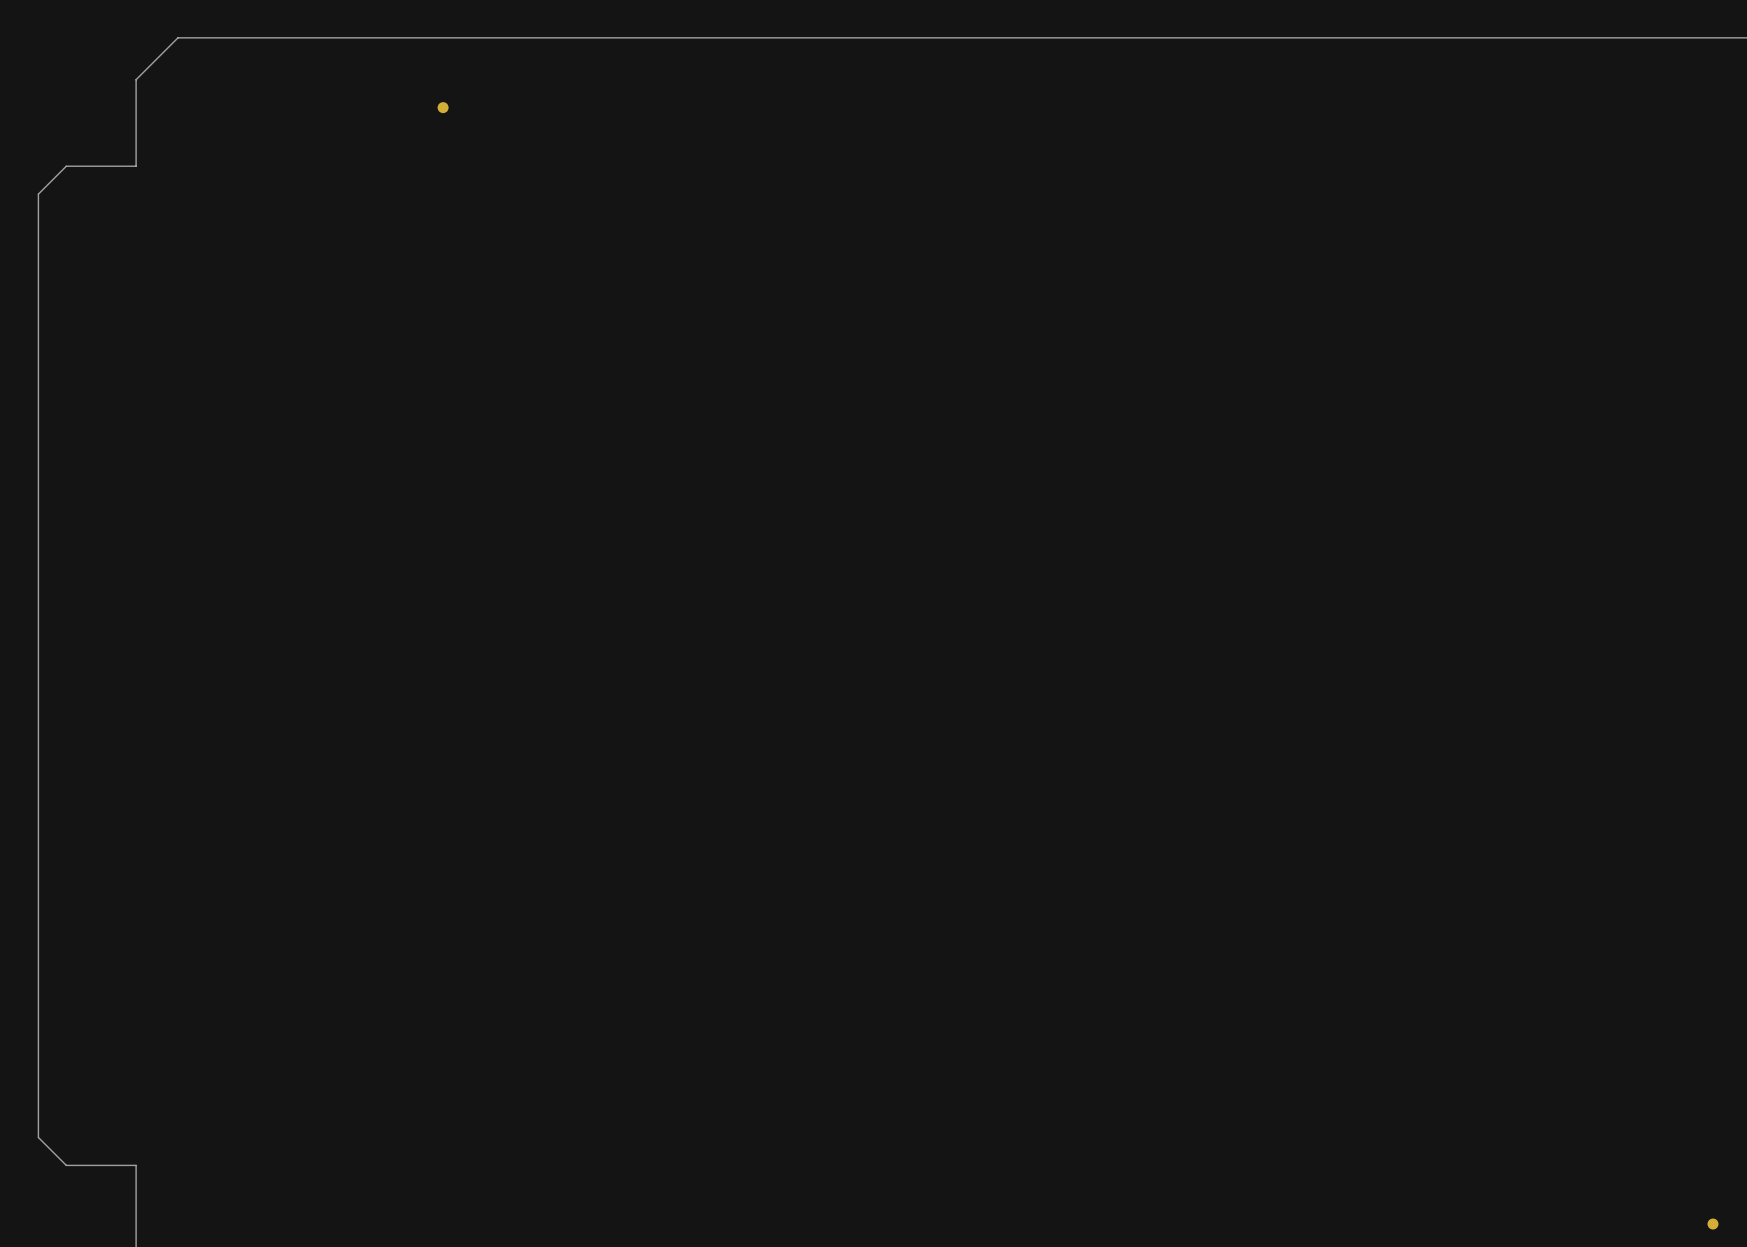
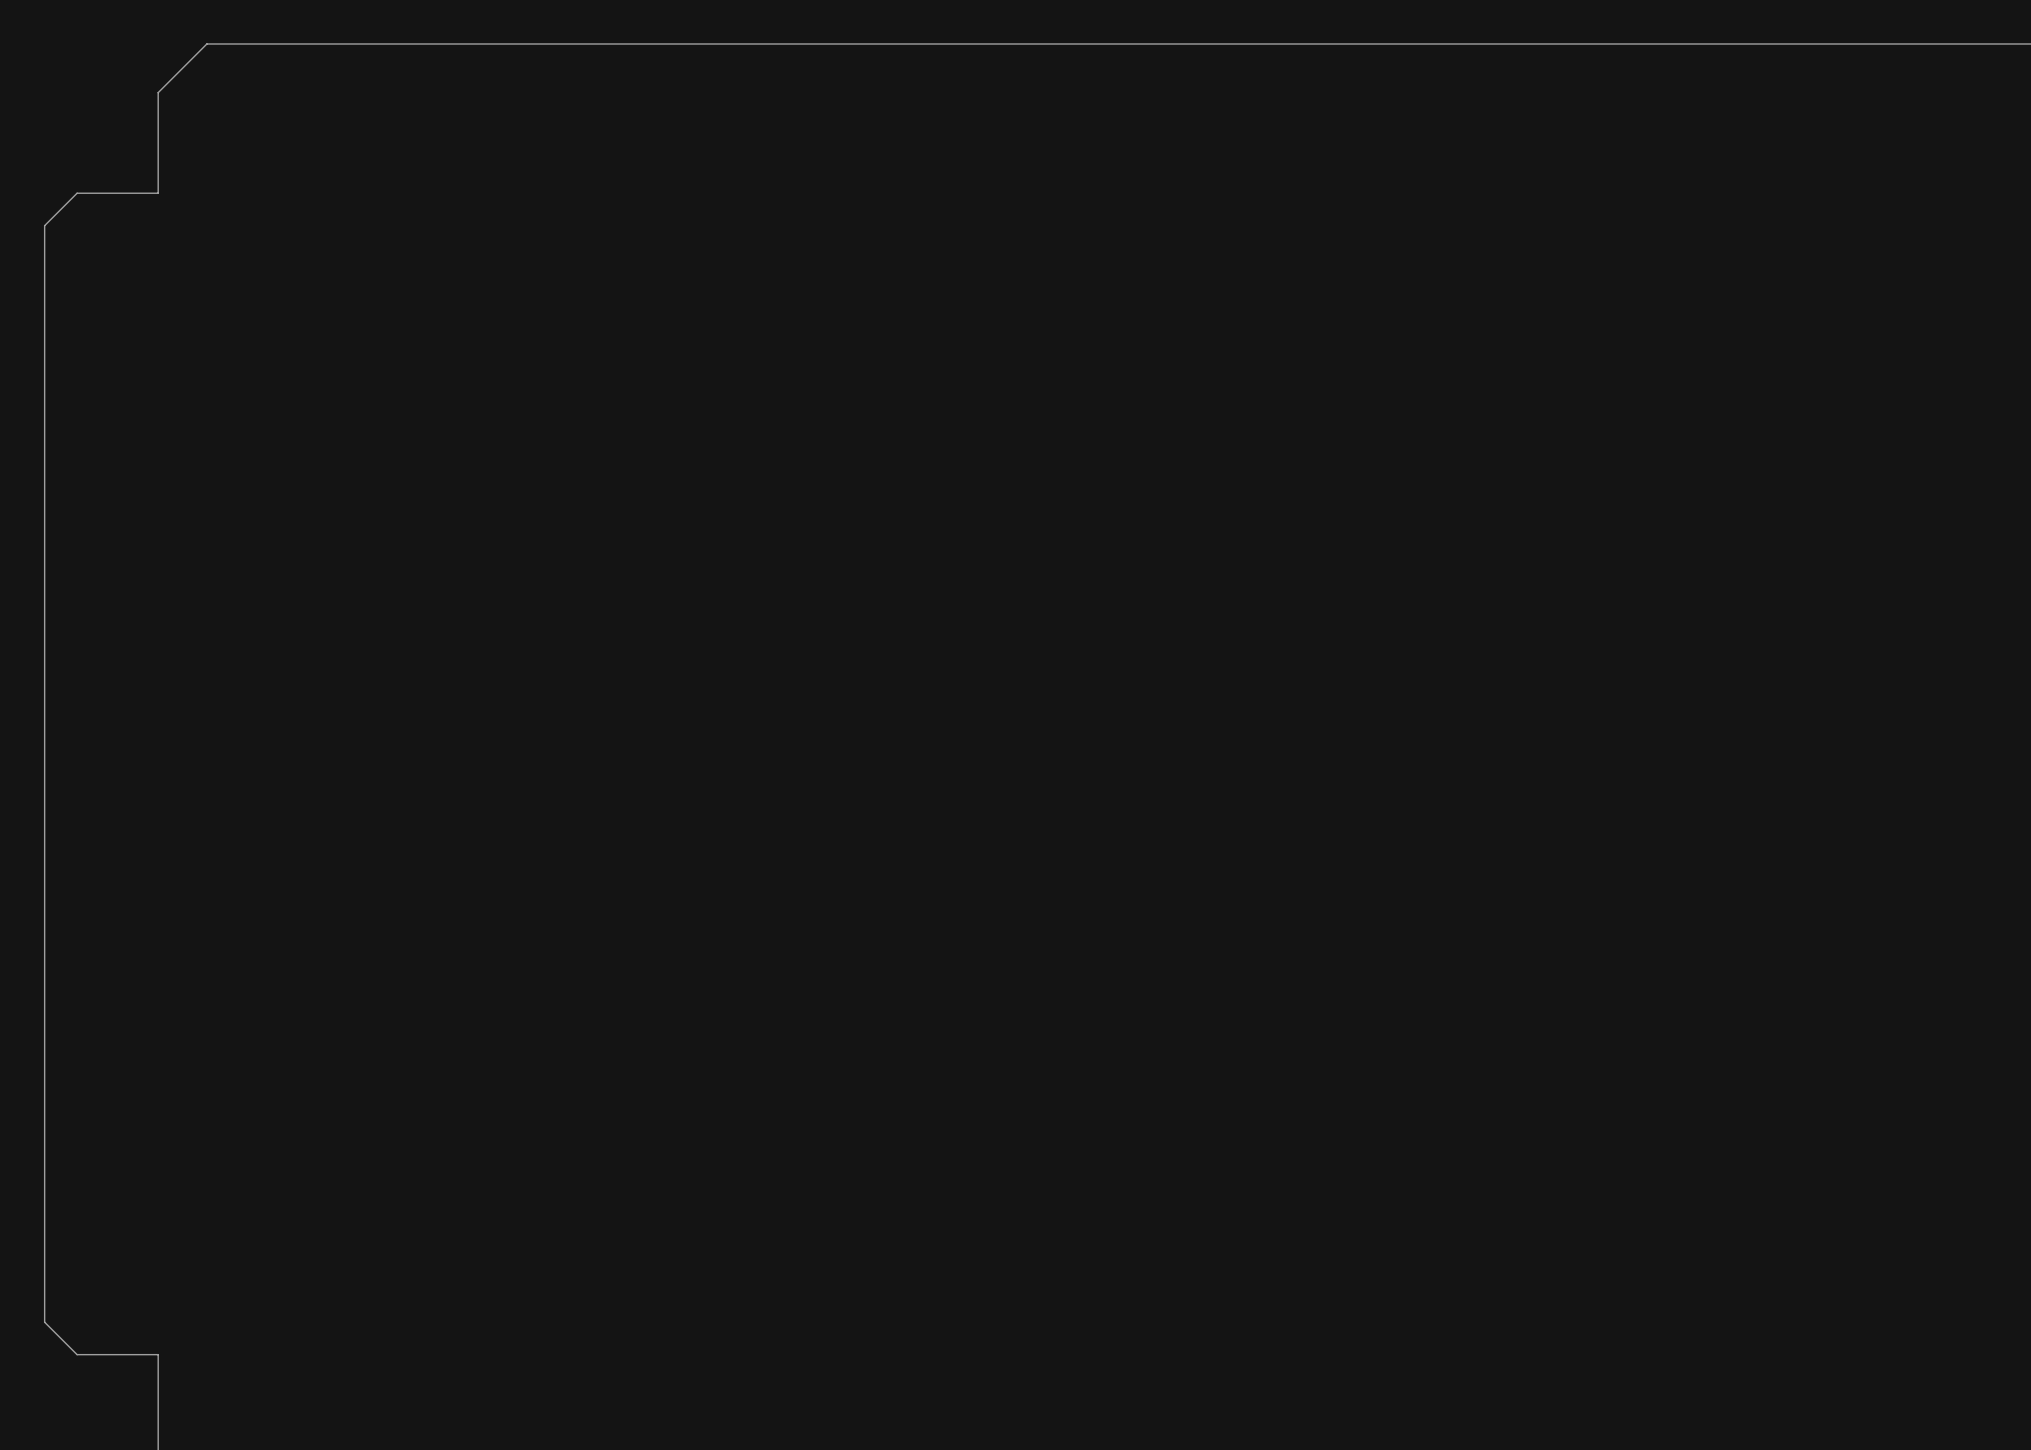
part: (443, 107) -> none
part: (1712, 1224) -> none

